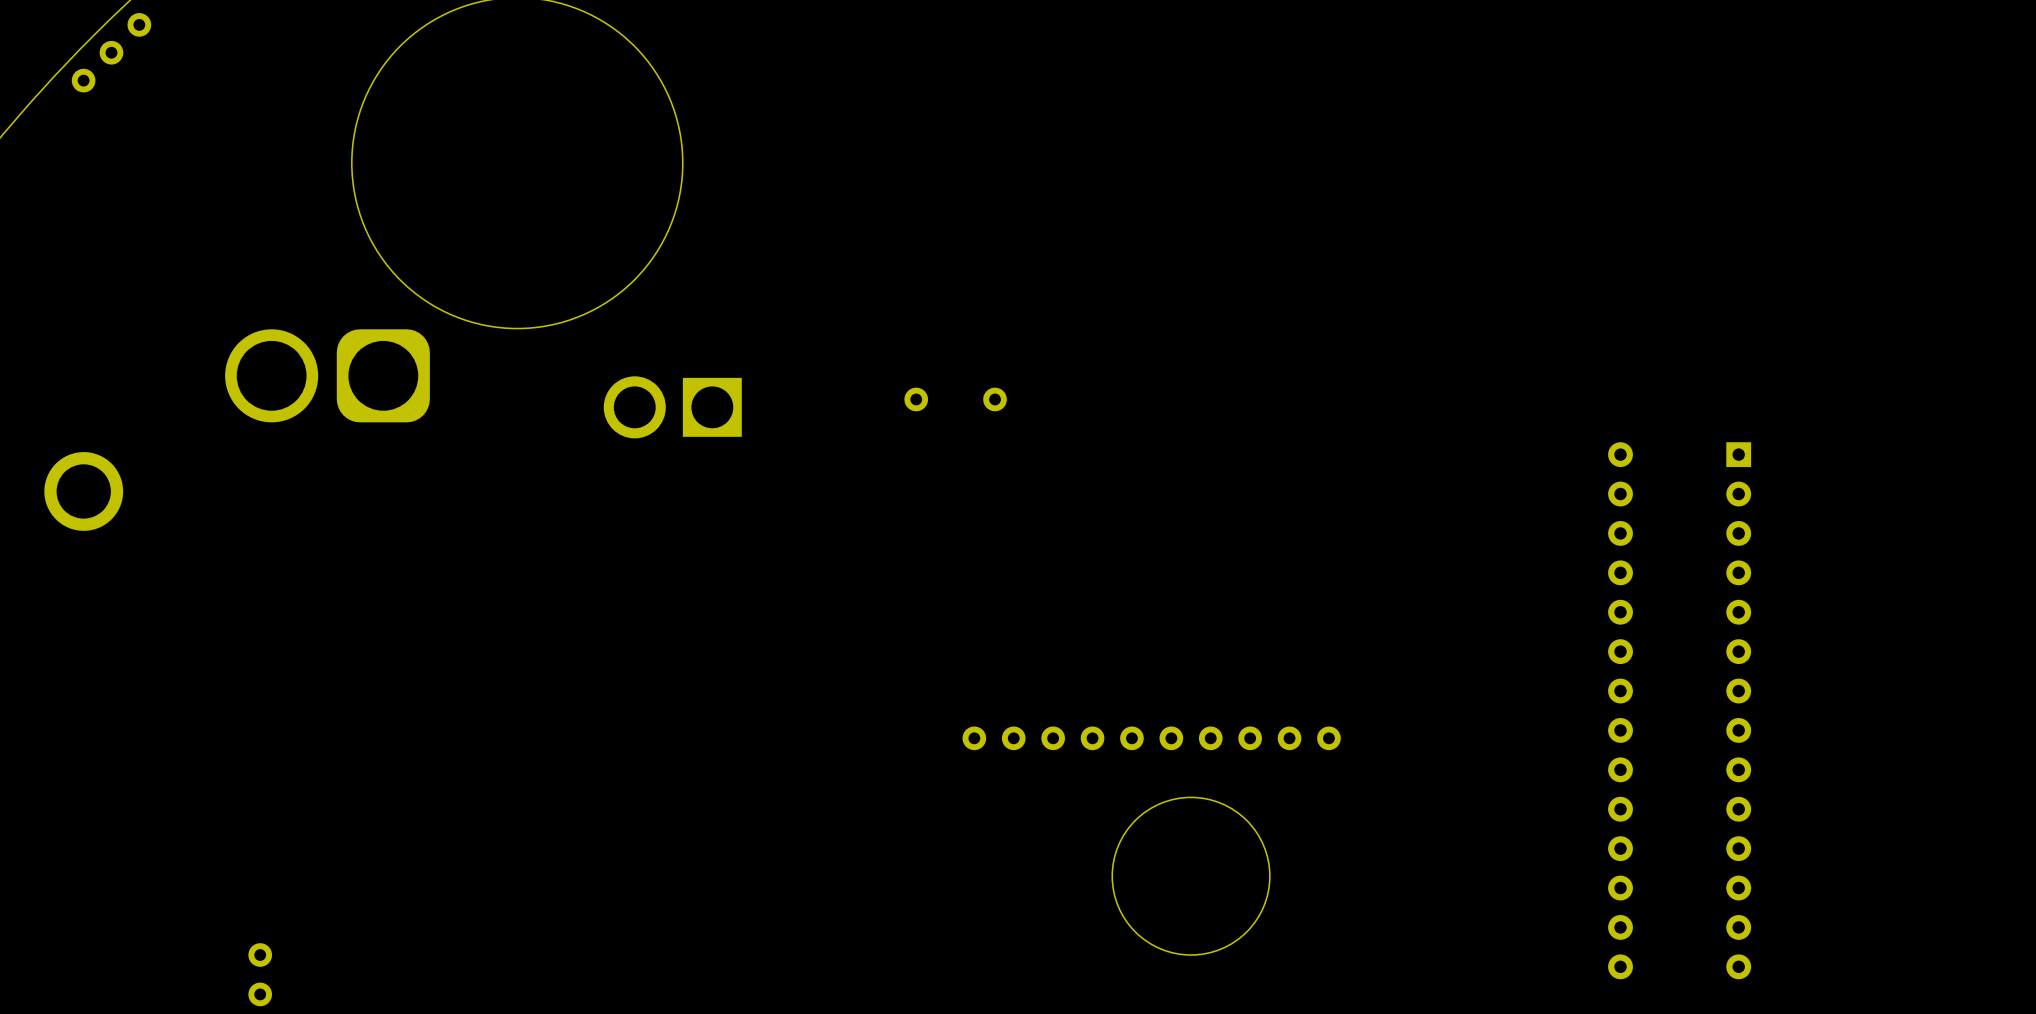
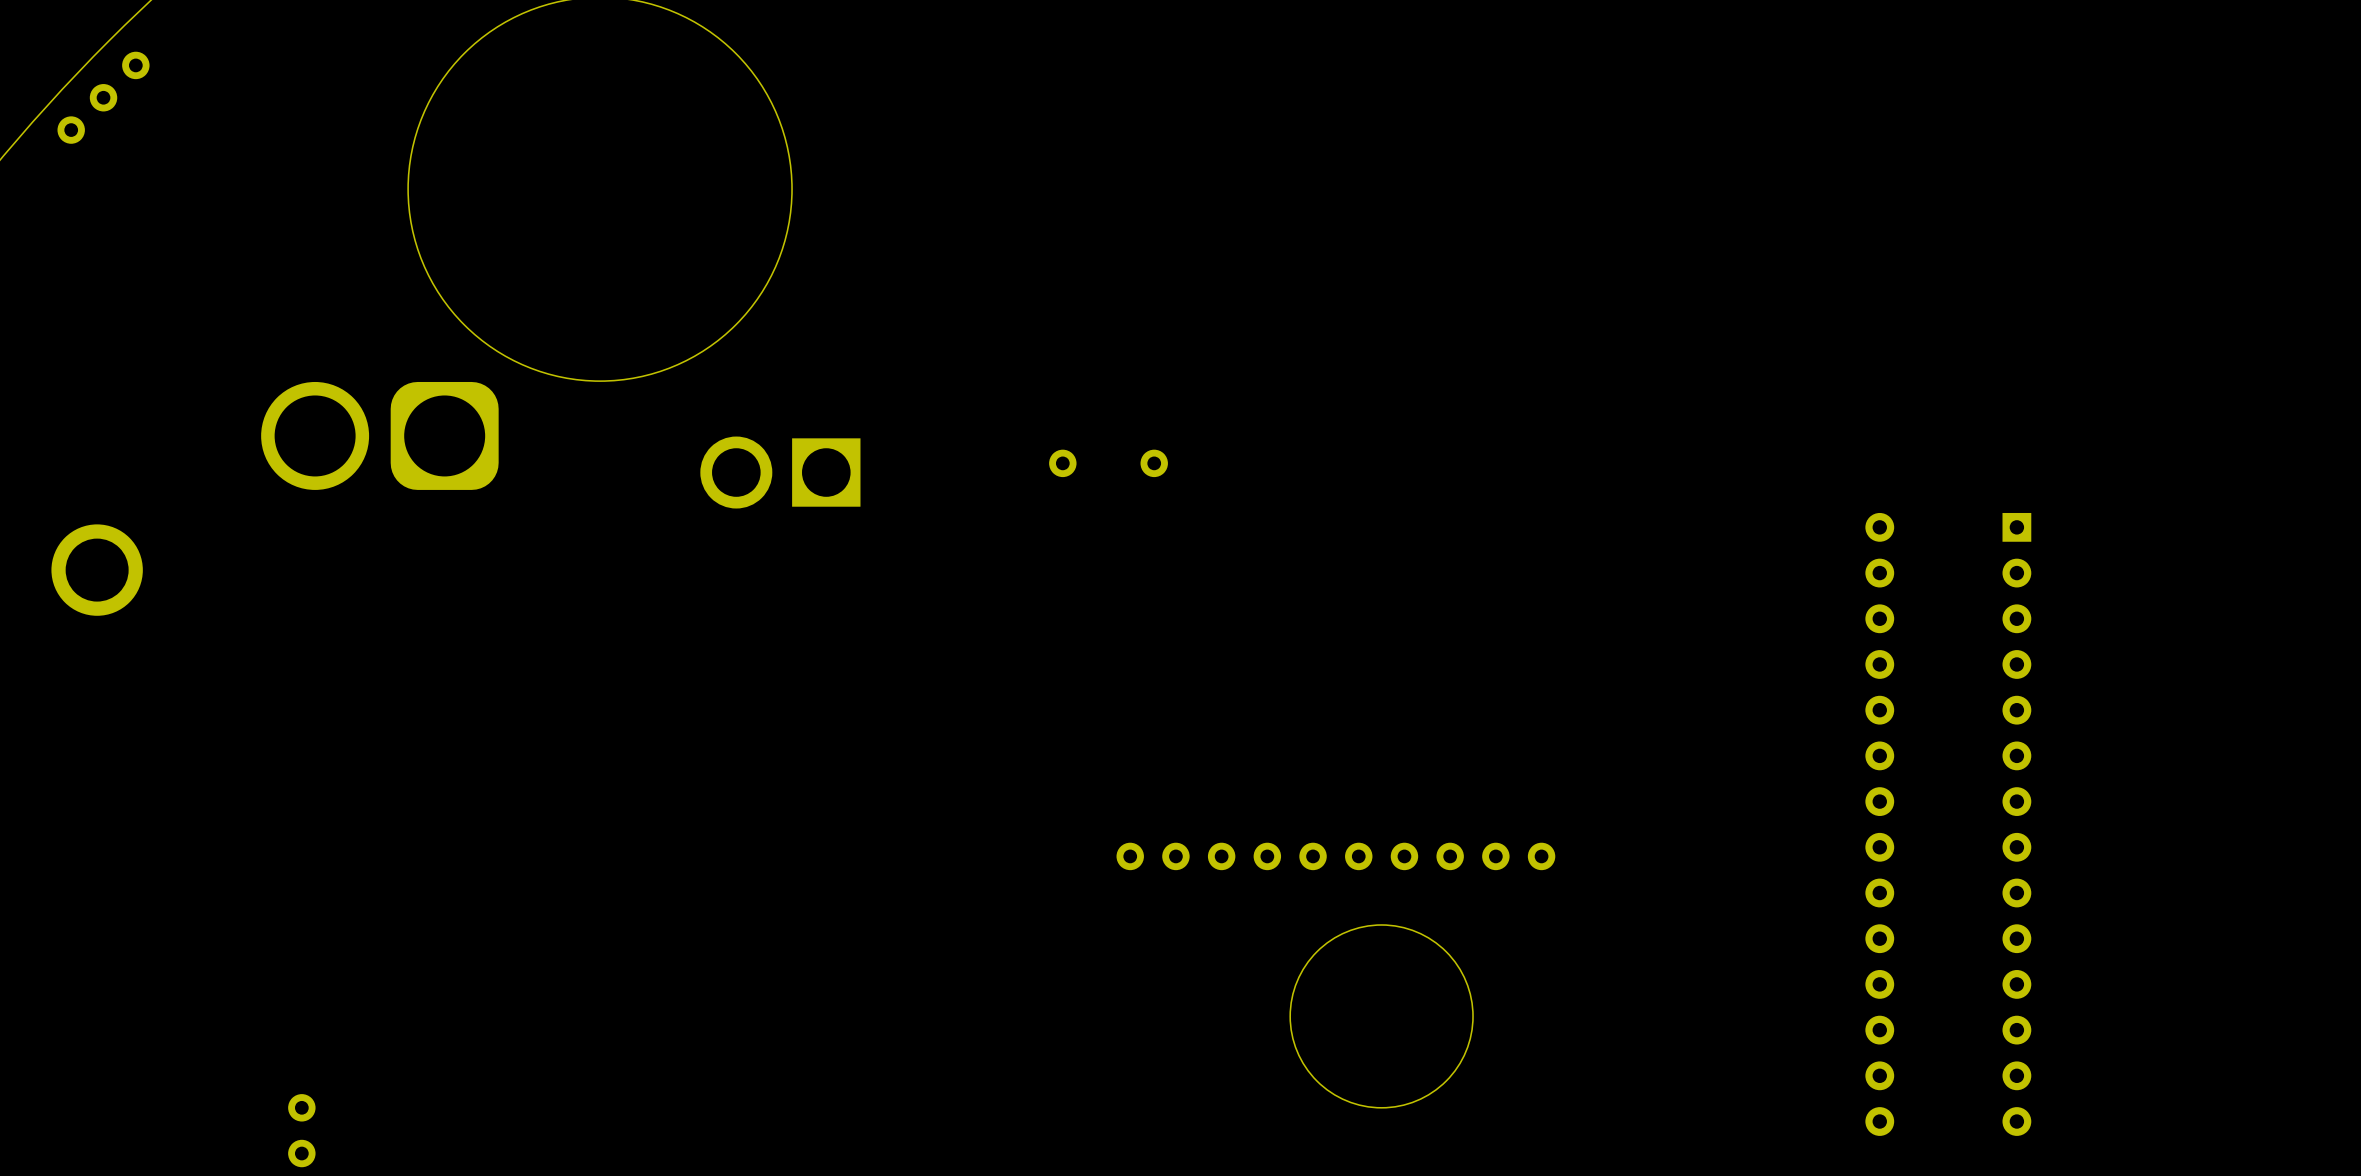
part position: (111, 52) -> (103, 97)

